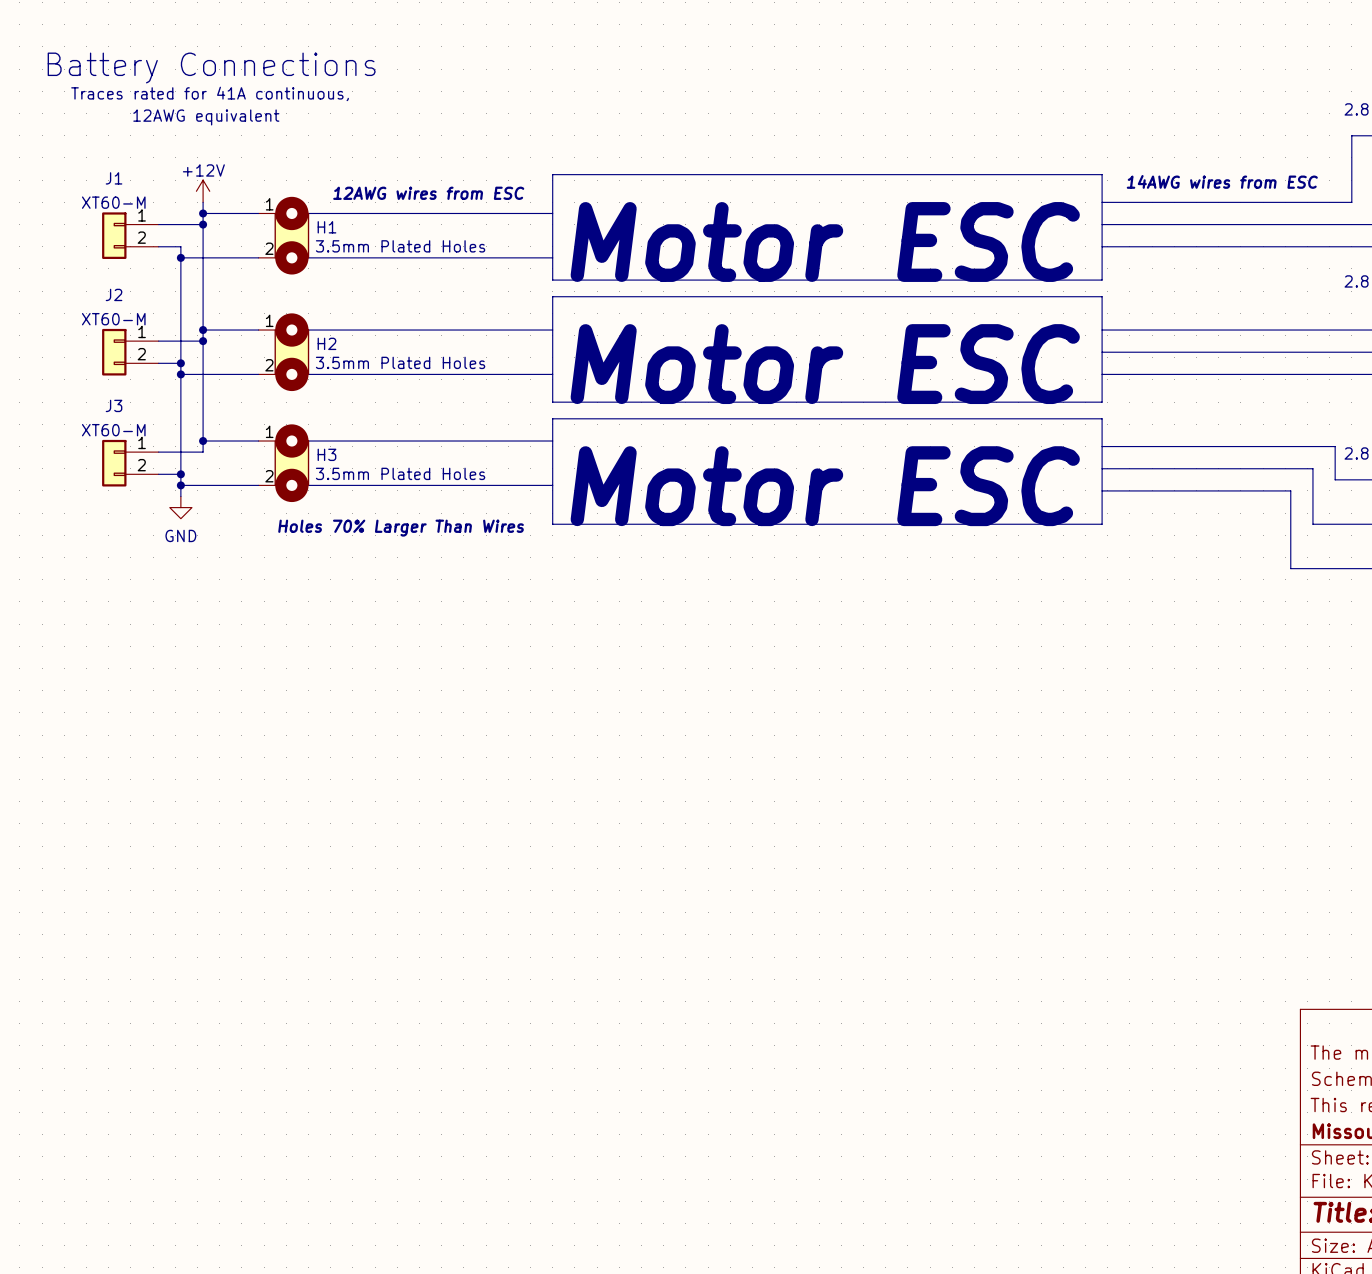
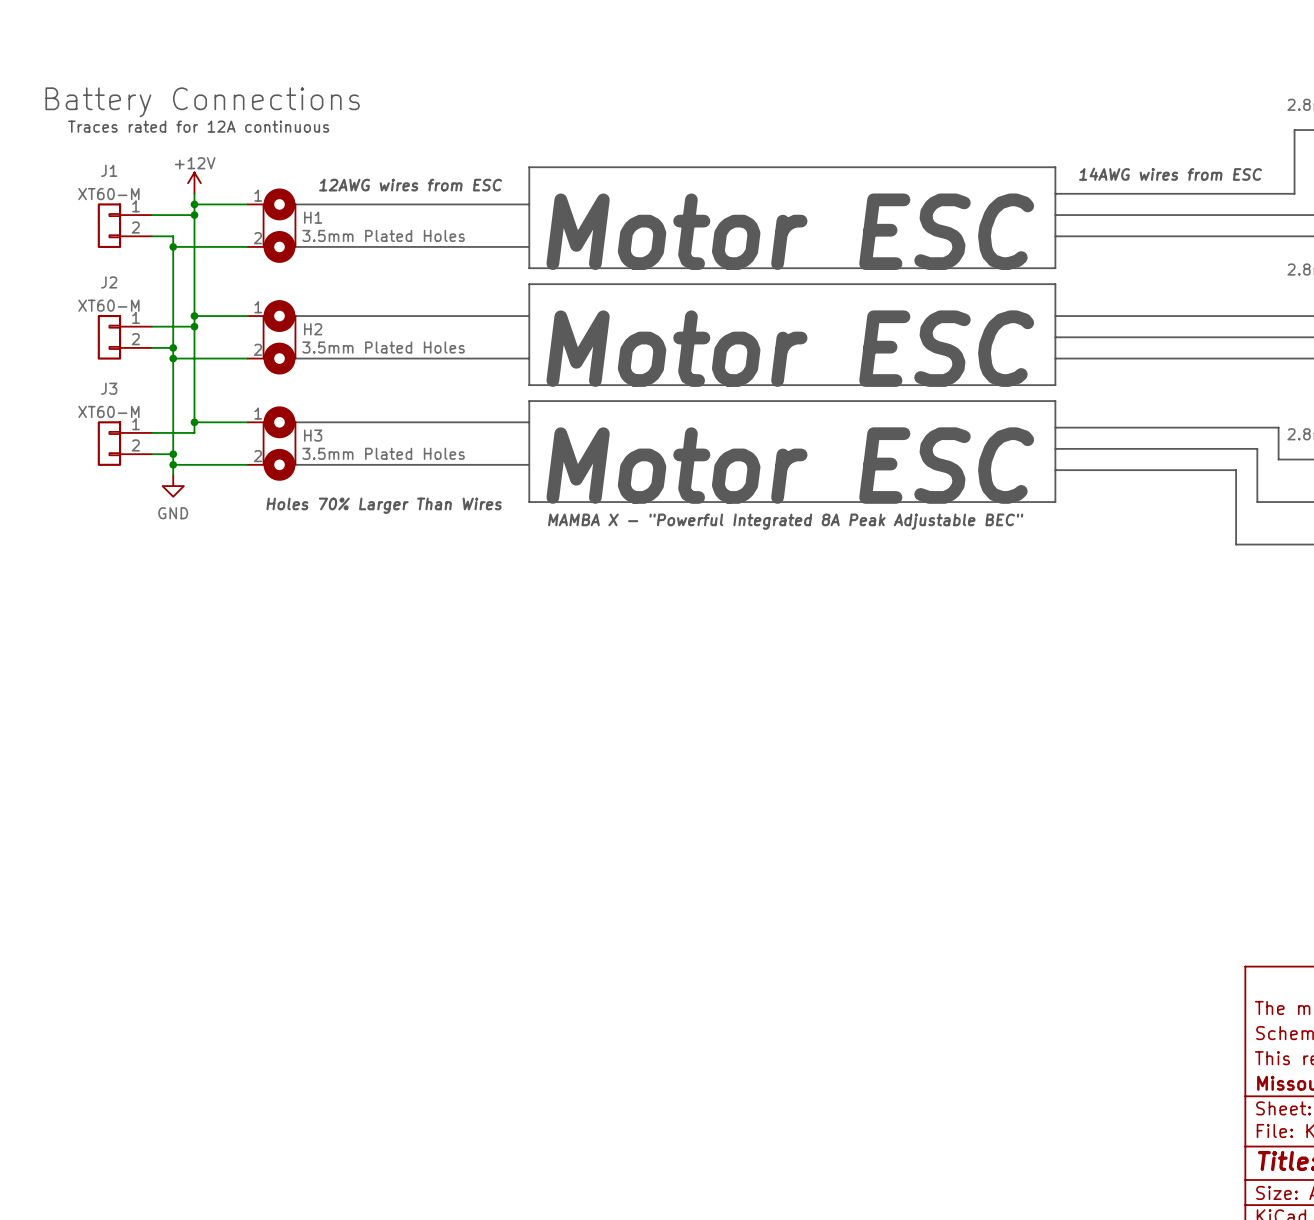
text position: Battery Connections (211, 67) -> Battery Connections (202, 102)
text: Traces rated for 41A continuous, (210, 93) -> none
text: 12AWG equivalent (206, 117) -> none
text: none -> Traces rated for 12A continuous (198, 126)
text: none -> MAMBA X - "Powerful Integrated 8A Peak Adjustable BEC" (785, 521)

